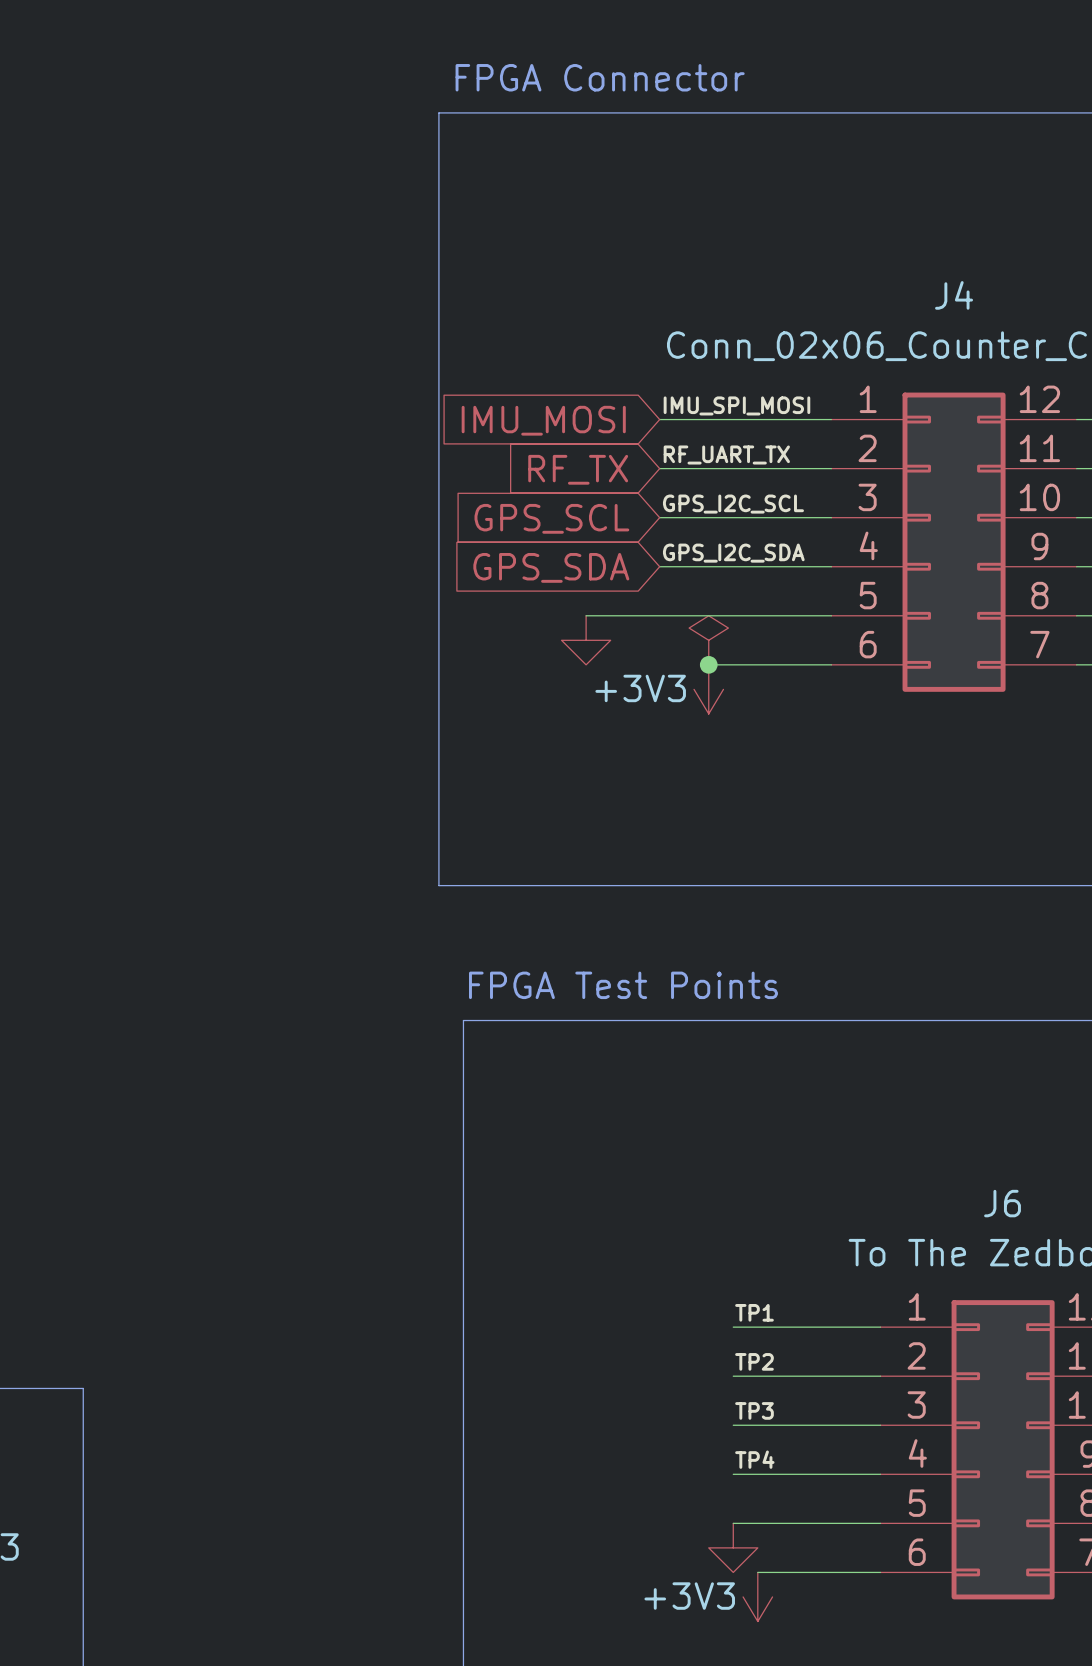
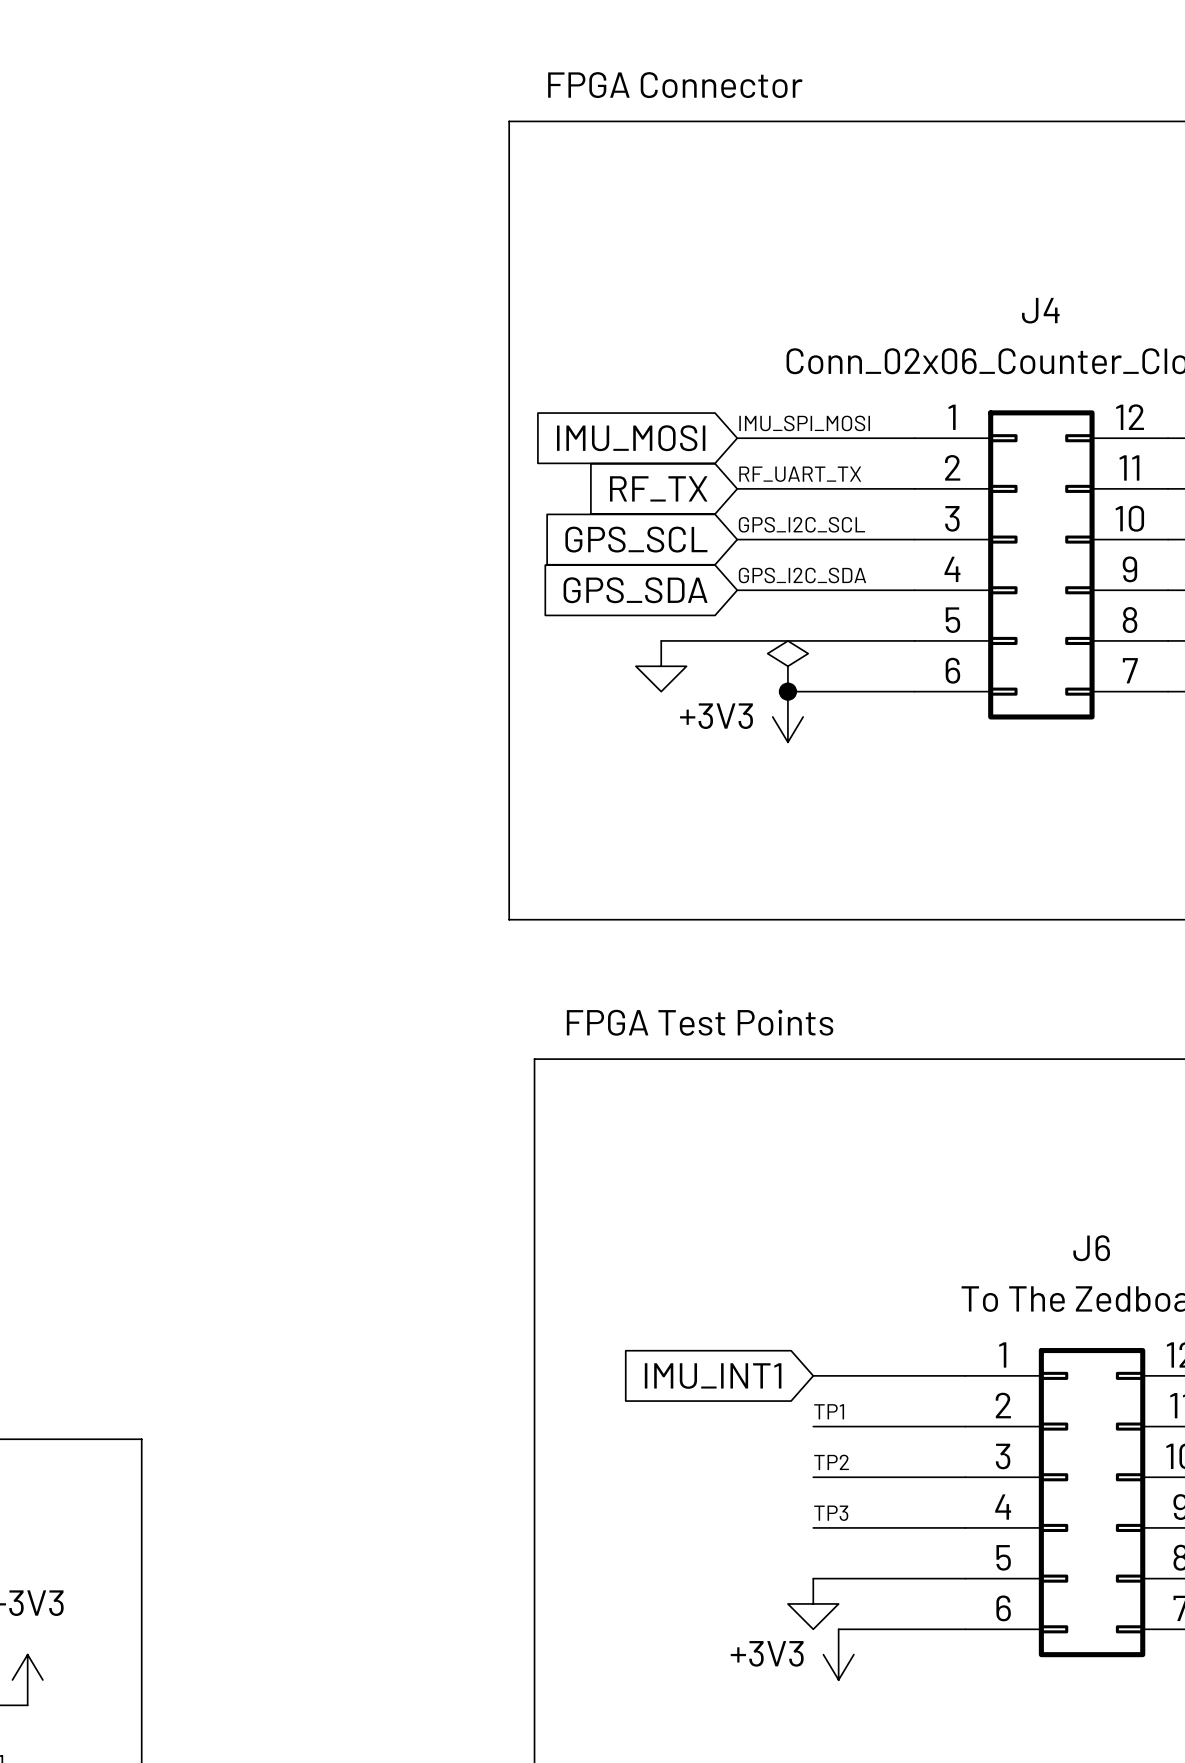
label: TP1 (754, 1312) -> none
global label: none -> IMU_INT1 (713, 1376)
label: TP2 (754, 1361) -> TP1 (829, 1411)
label: TP3 (754, 1410) -> TP2 (831, 1462)
label: TP4 (754, 1459) -> TP3 (831, 1513)

